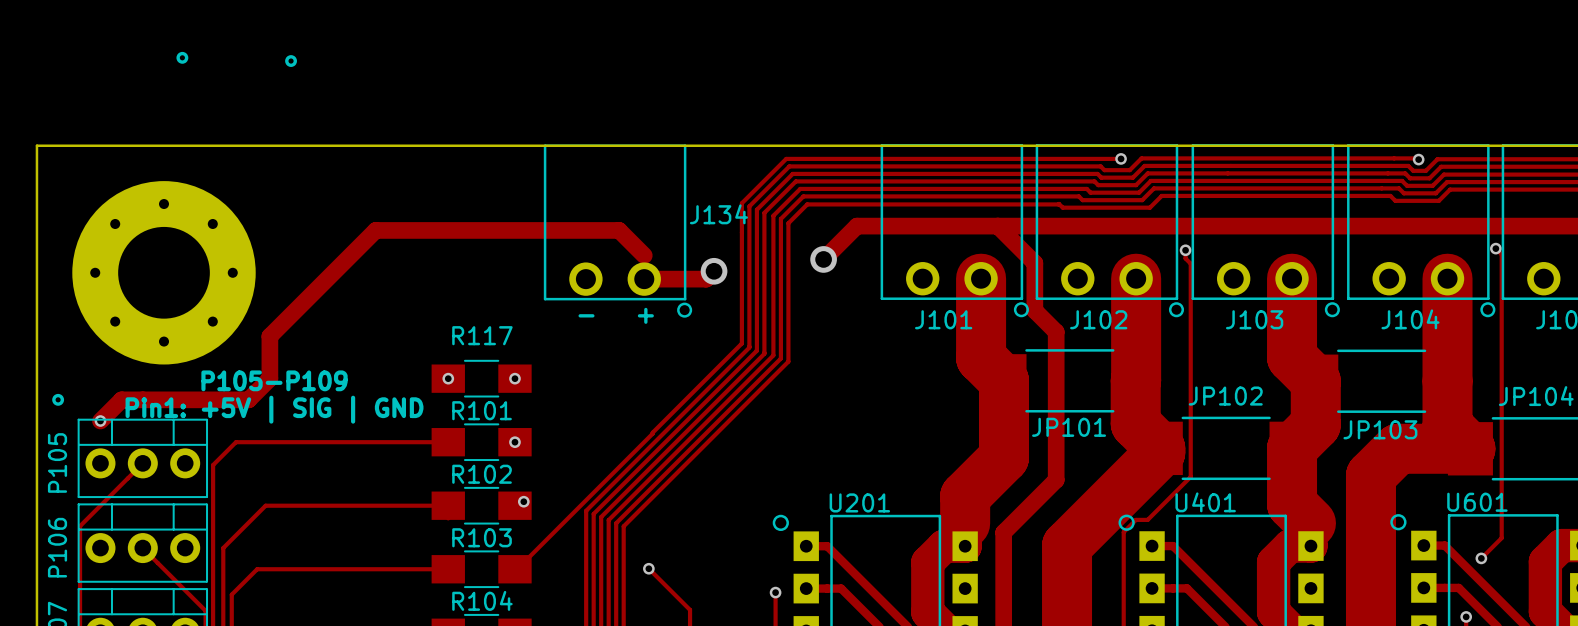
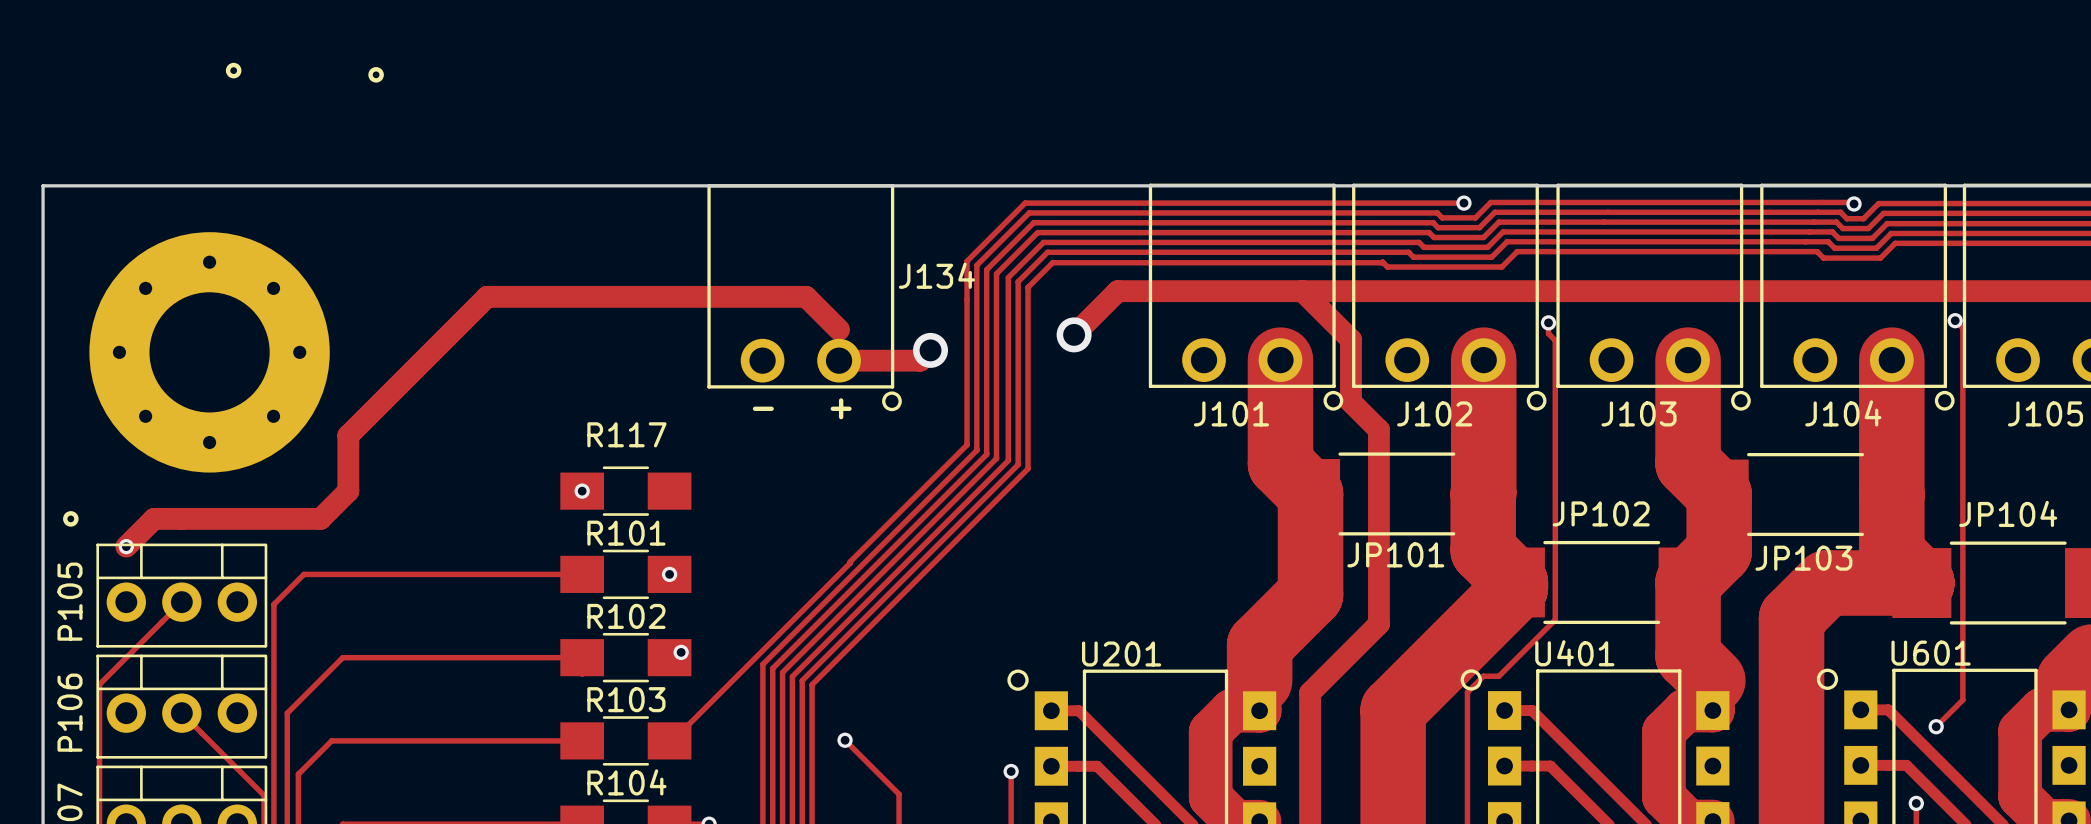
via: (514, 378) -> none
text: P105-P109 (274, 380) -> none
text: Pin1: +5V | SIG | GND (274, 409) -> none

